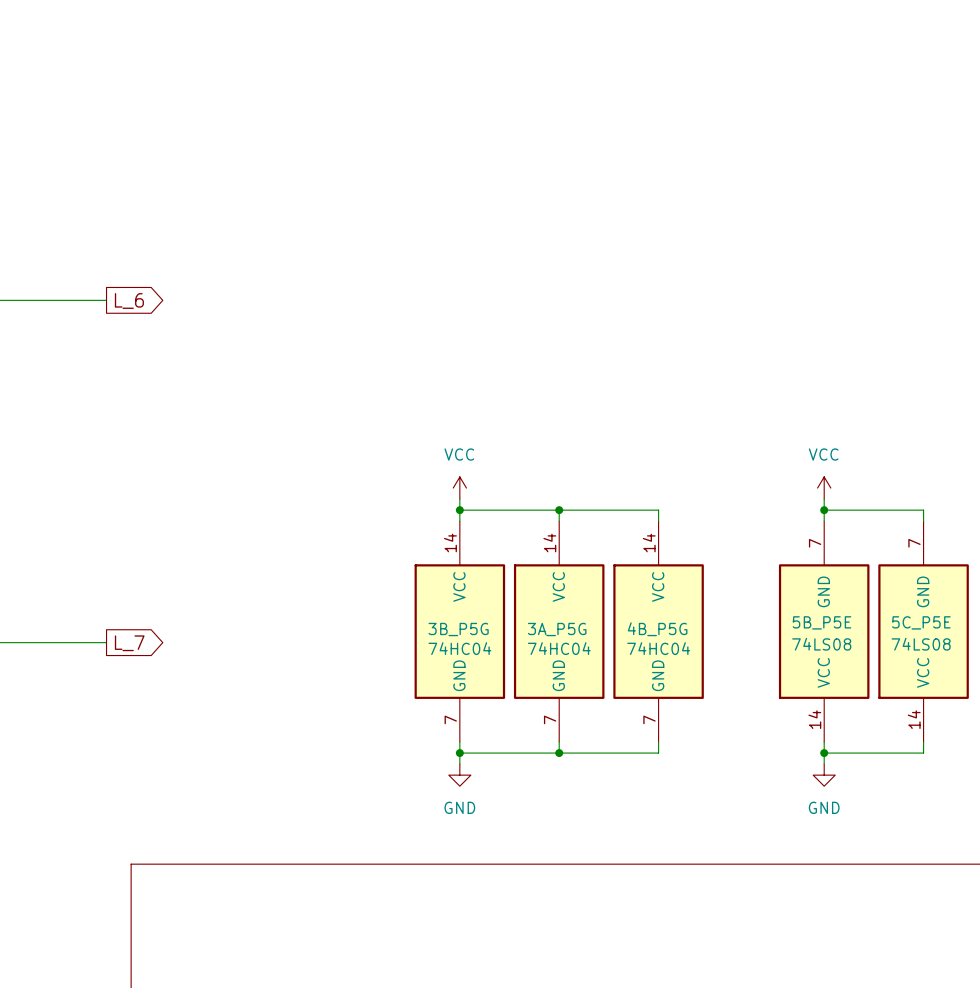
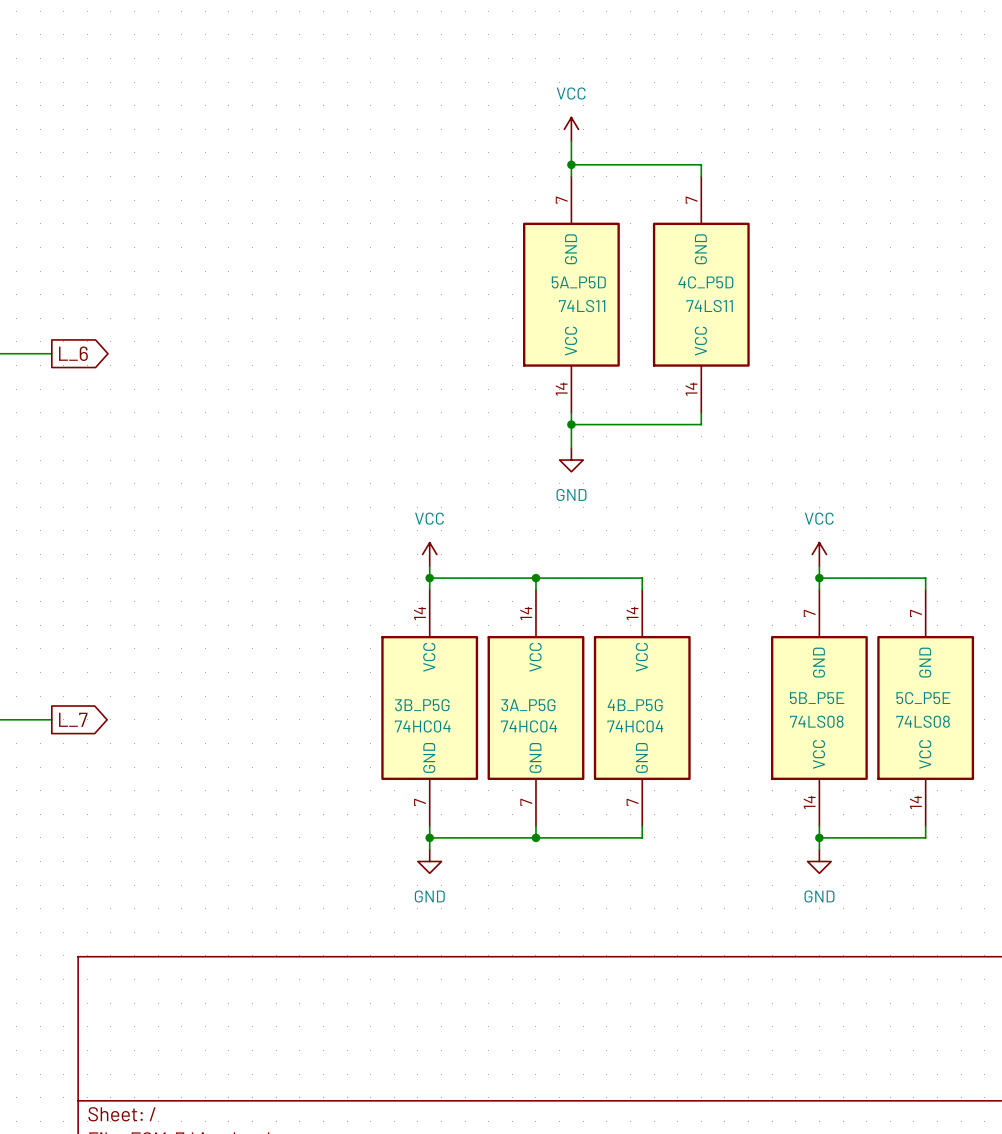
power symbol: none -> VCC (571, 129)
wire: none -> (571, 141) (571, 176)
wire: none -> (571, 164) (701, 164) (701, 176)
junction: none -> (571, 164)
5A_P5D: none -> 74LS11 (571, 294)
4C_P5D: none -> 74LS11 (701, 294)
wire: none -> (571, 412) (571, 448)
wire: none -> (701, 412) (701, 424) (571, 424)
junction: none -> (571, 424)
power symbol: none -> GND (571, 460)

